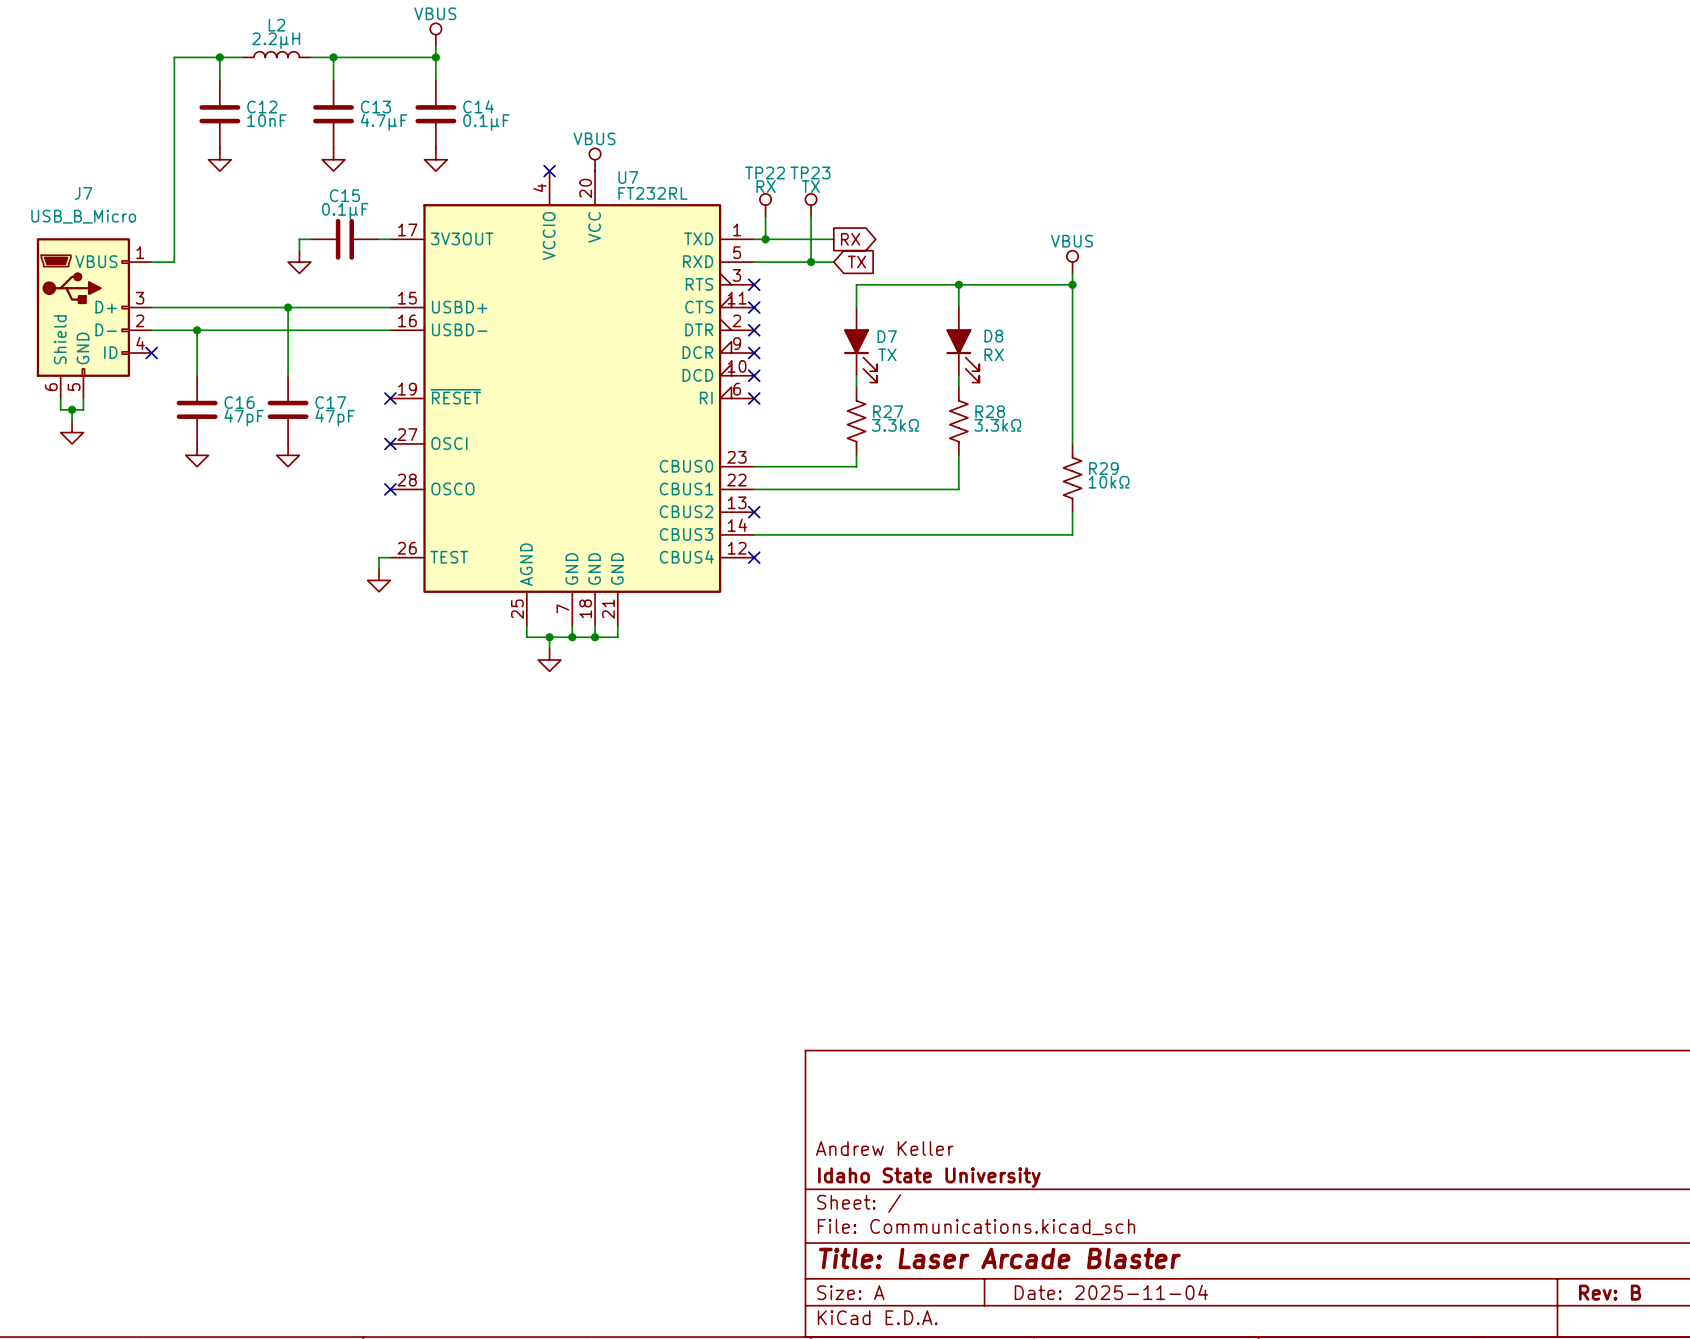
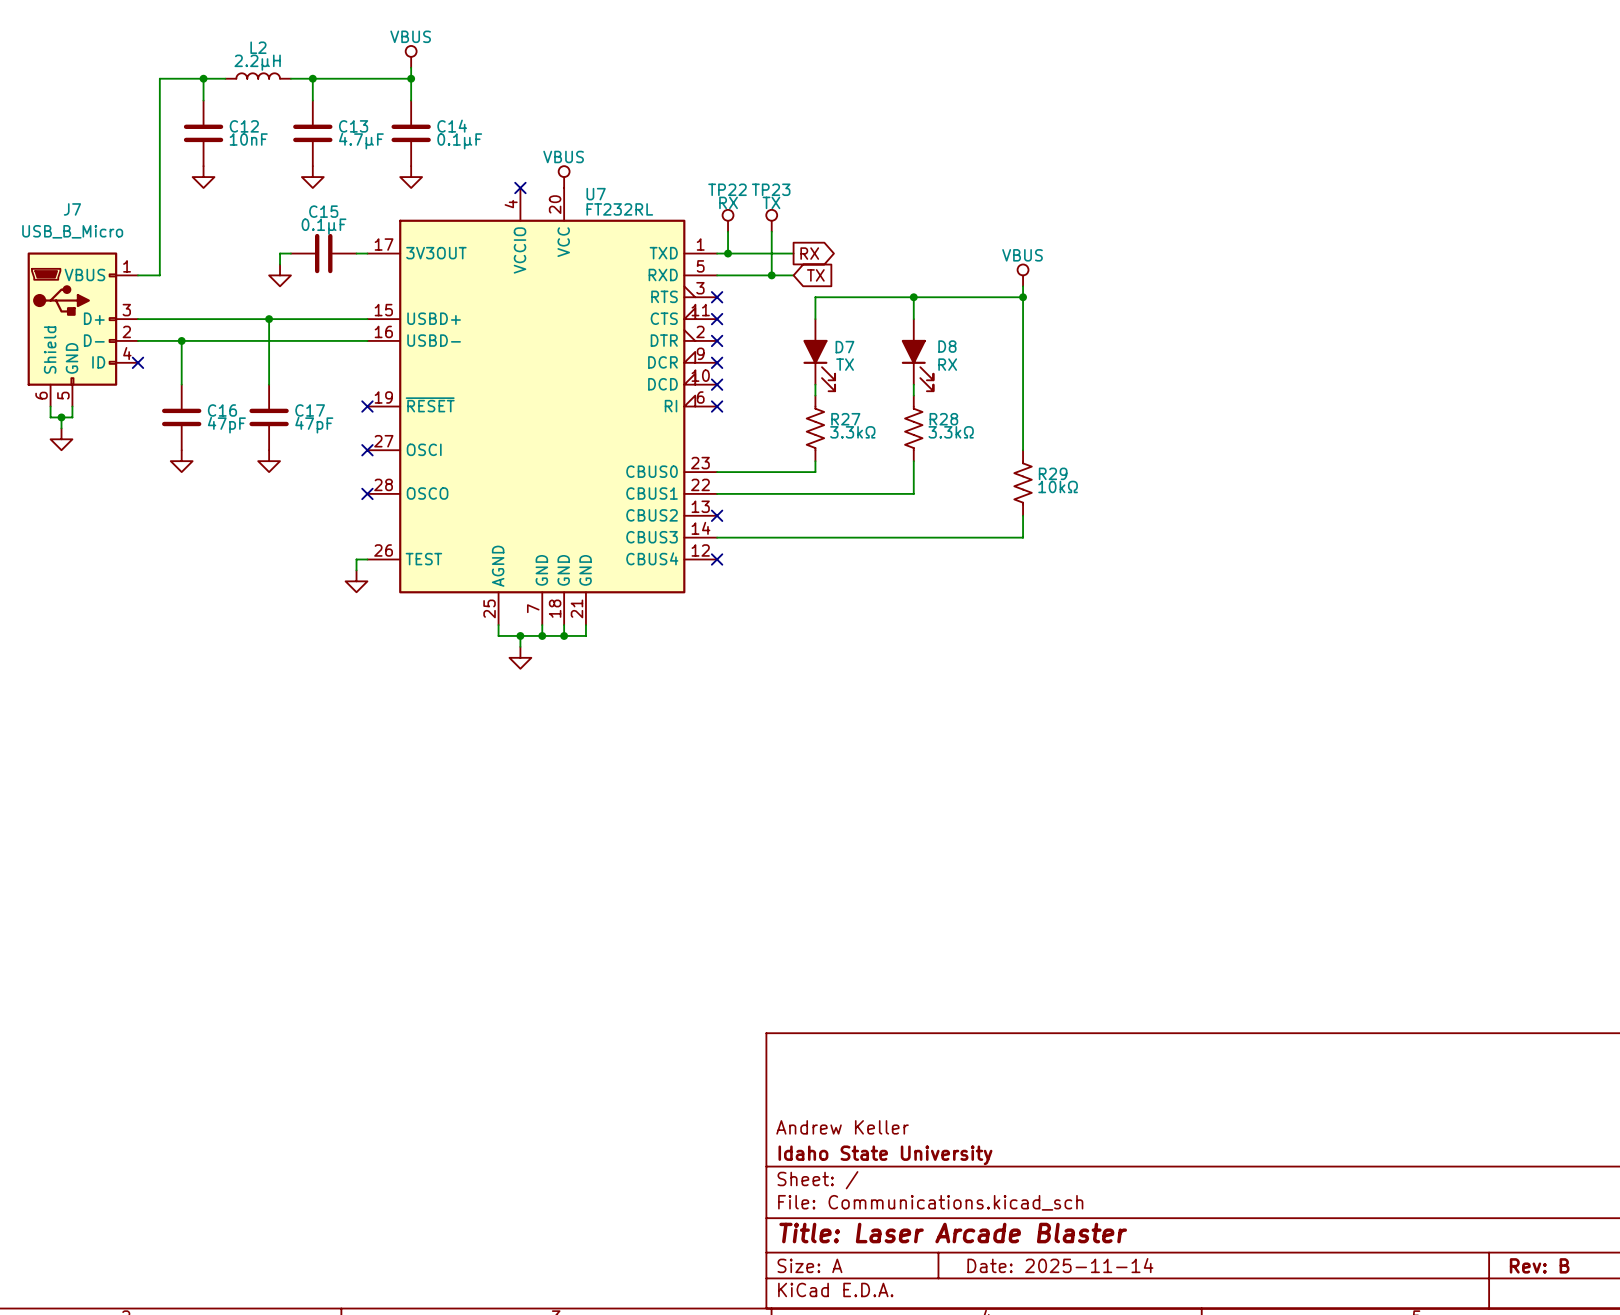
title block: Date: 2025-11-04 (1111, 1292) -> Date: 2025-11-14 (1060, 1265)

